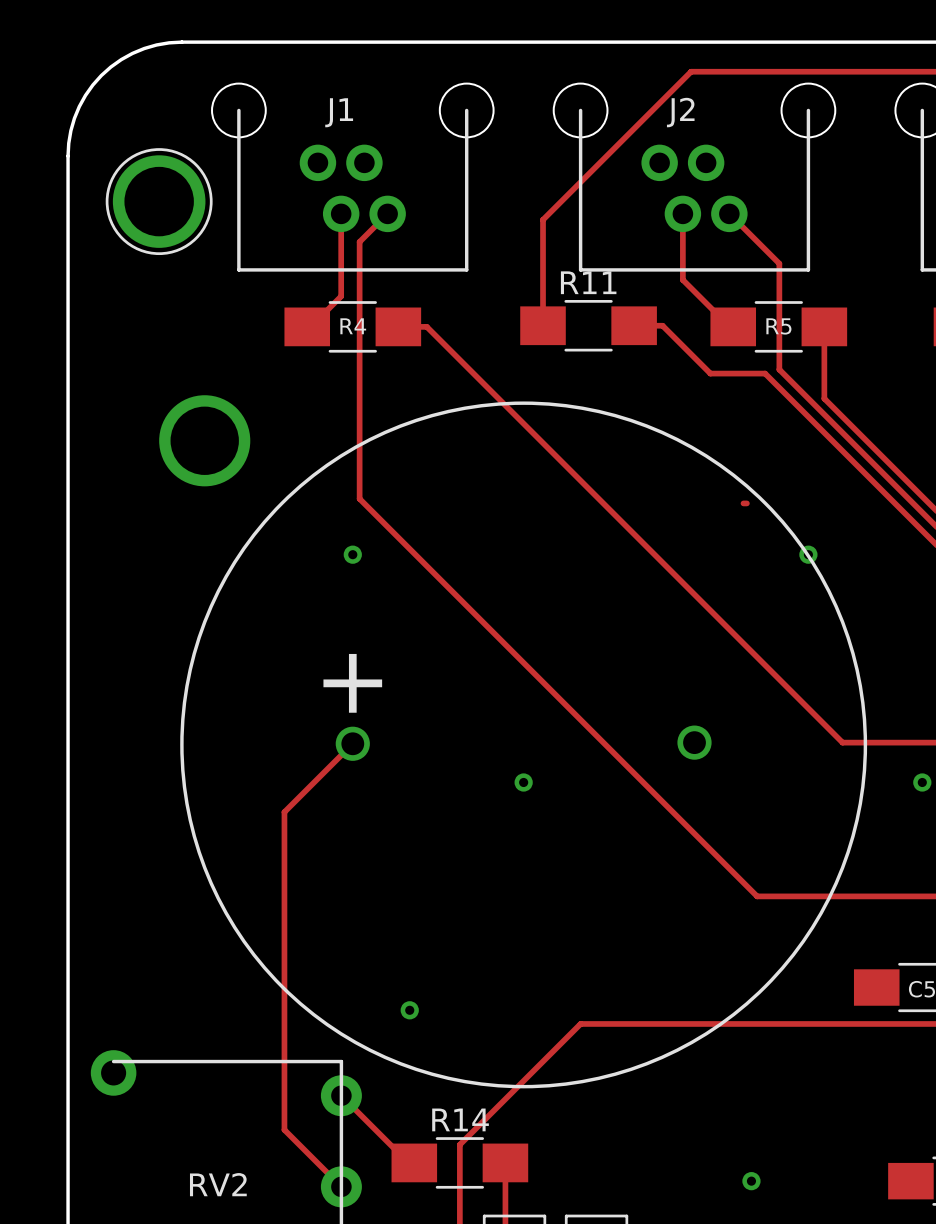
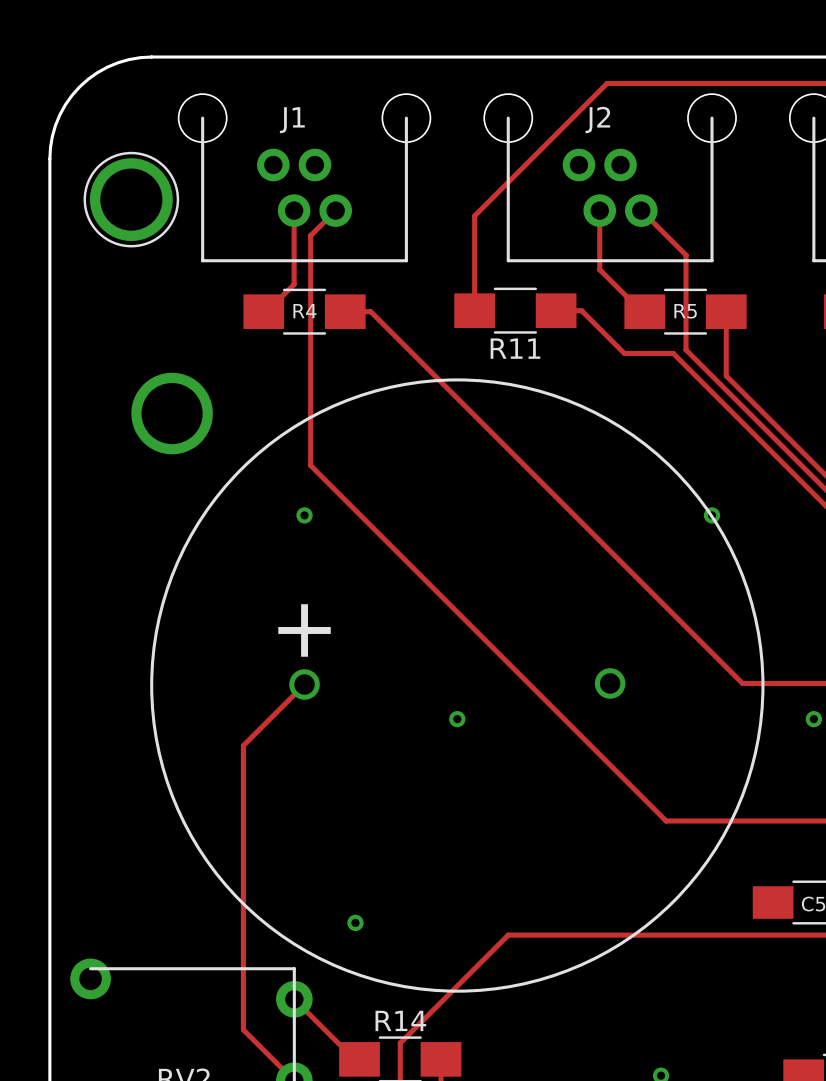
R11 name position: R11 (588, 282) -> R11 (515, 348)
track: (743, 503) (746, 503) -> none

